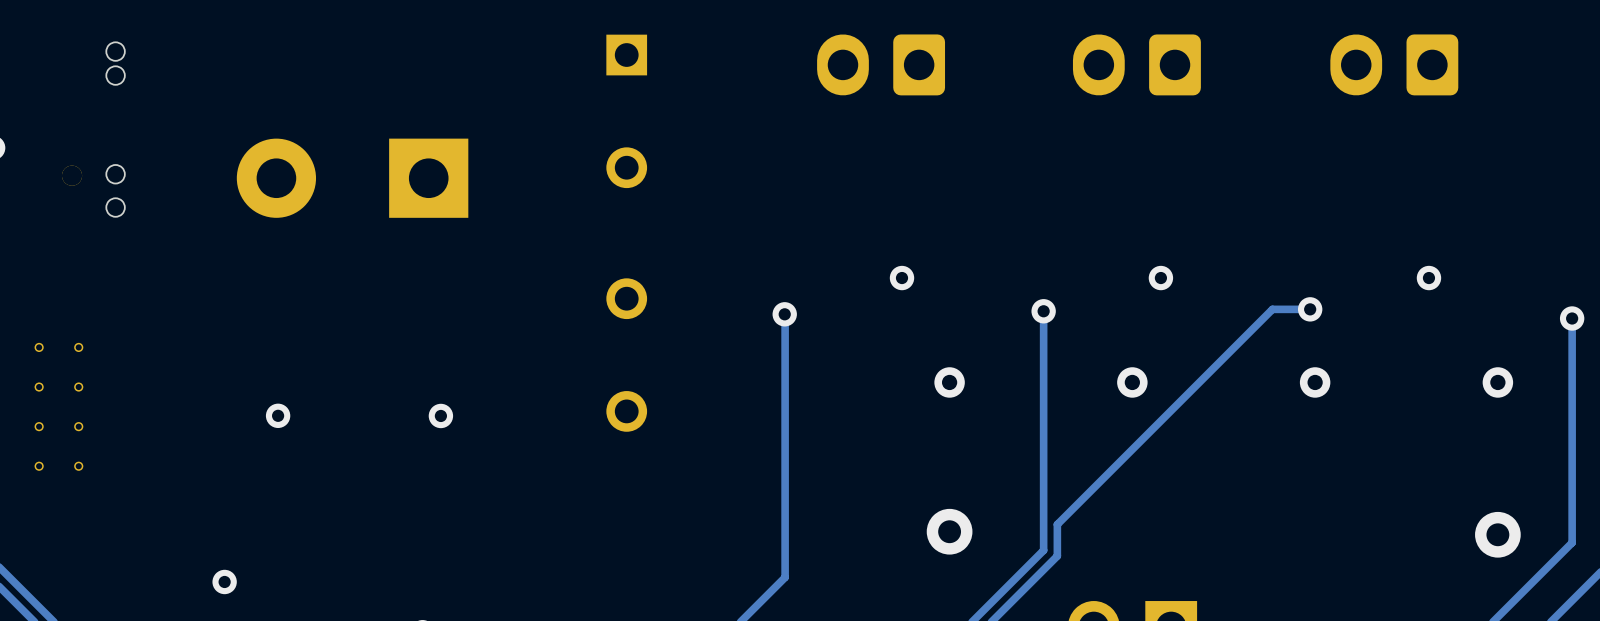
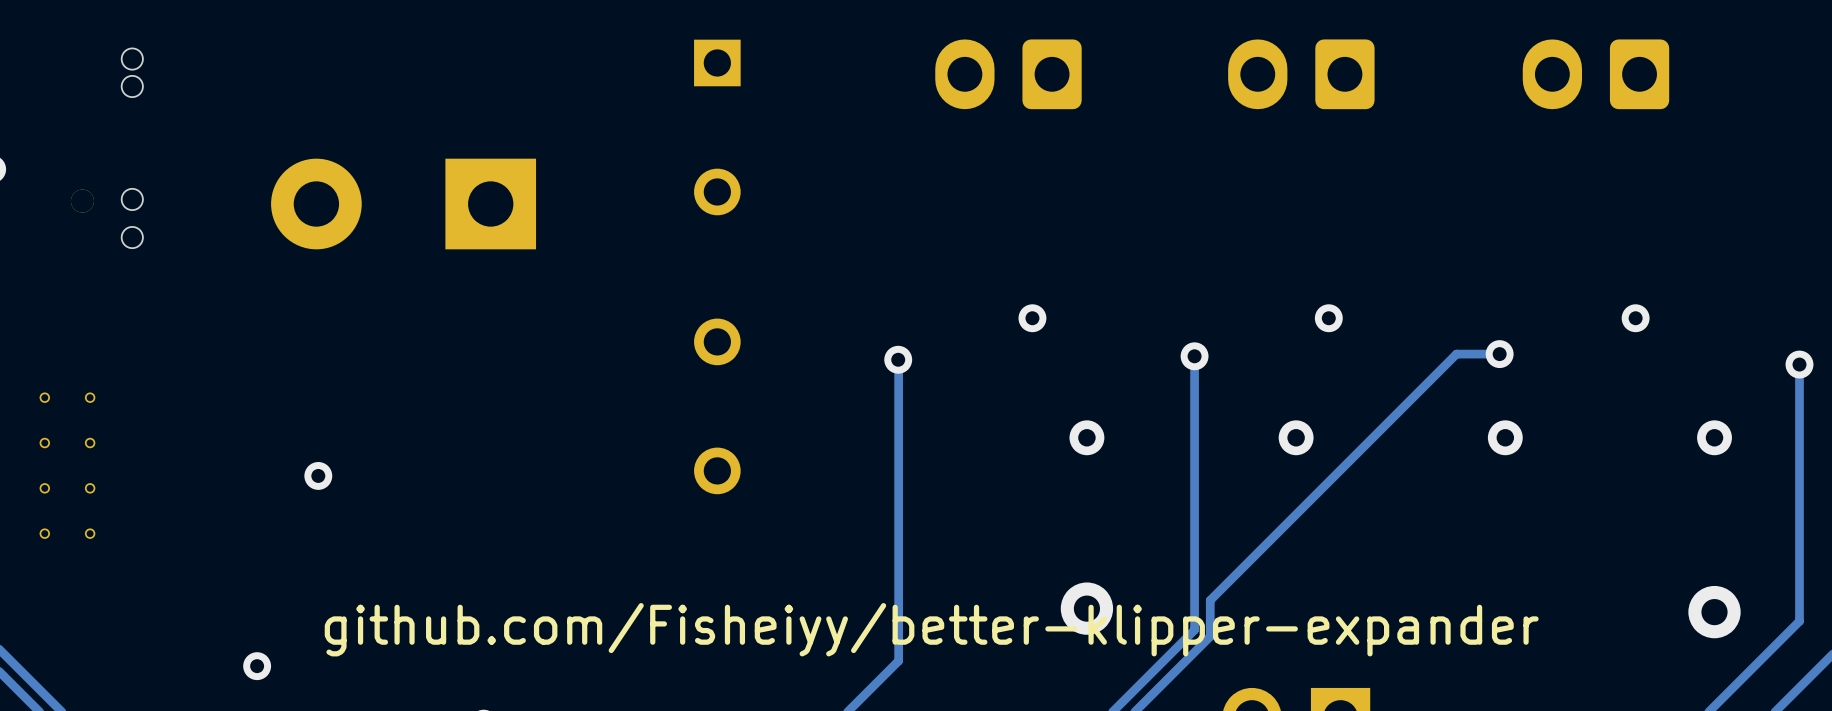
via: (440, 415) -> none
text: none -> github.com/Fisheiyy/better-klipper-expander (931, 629)

